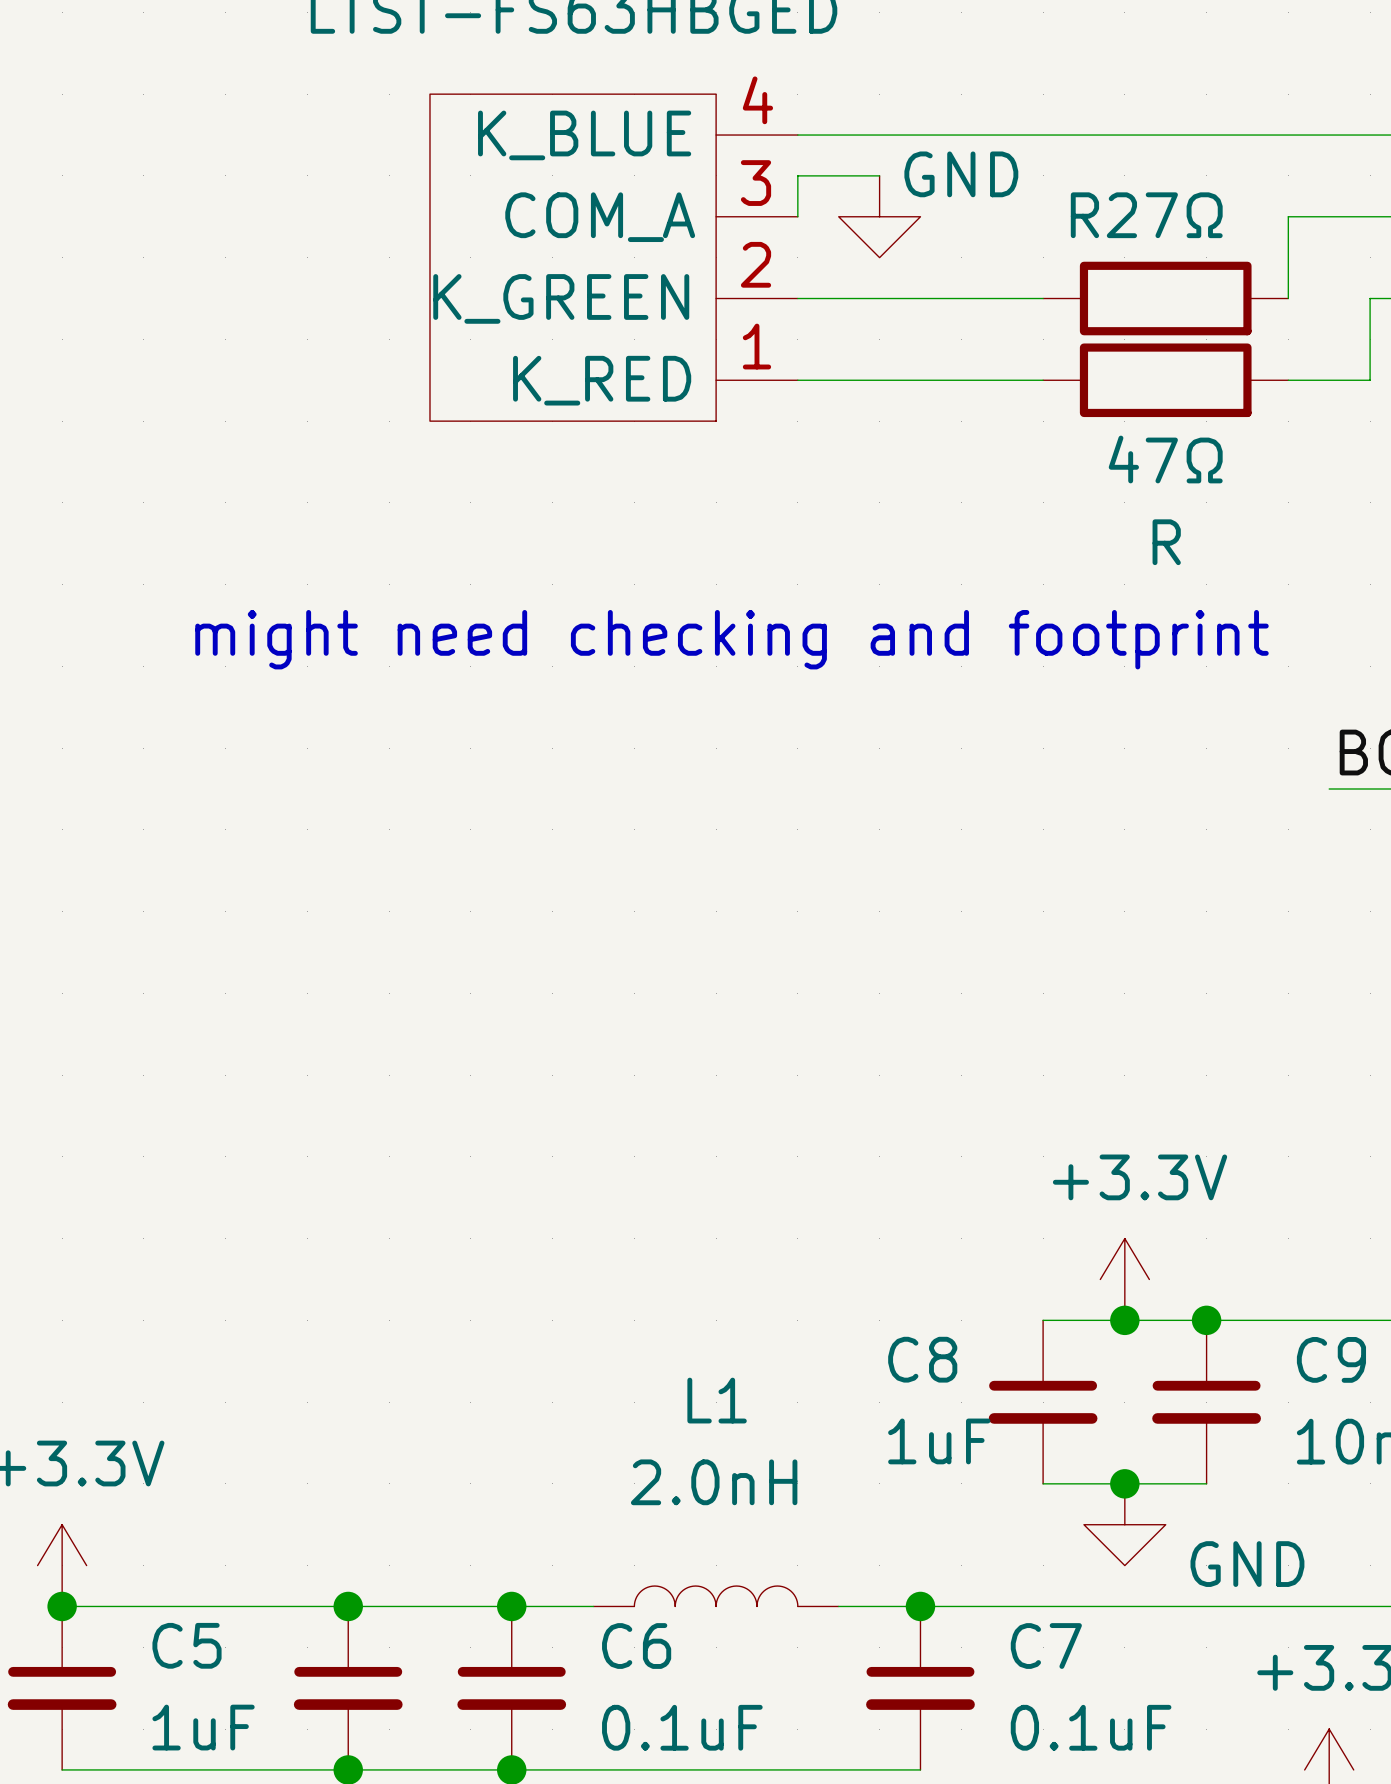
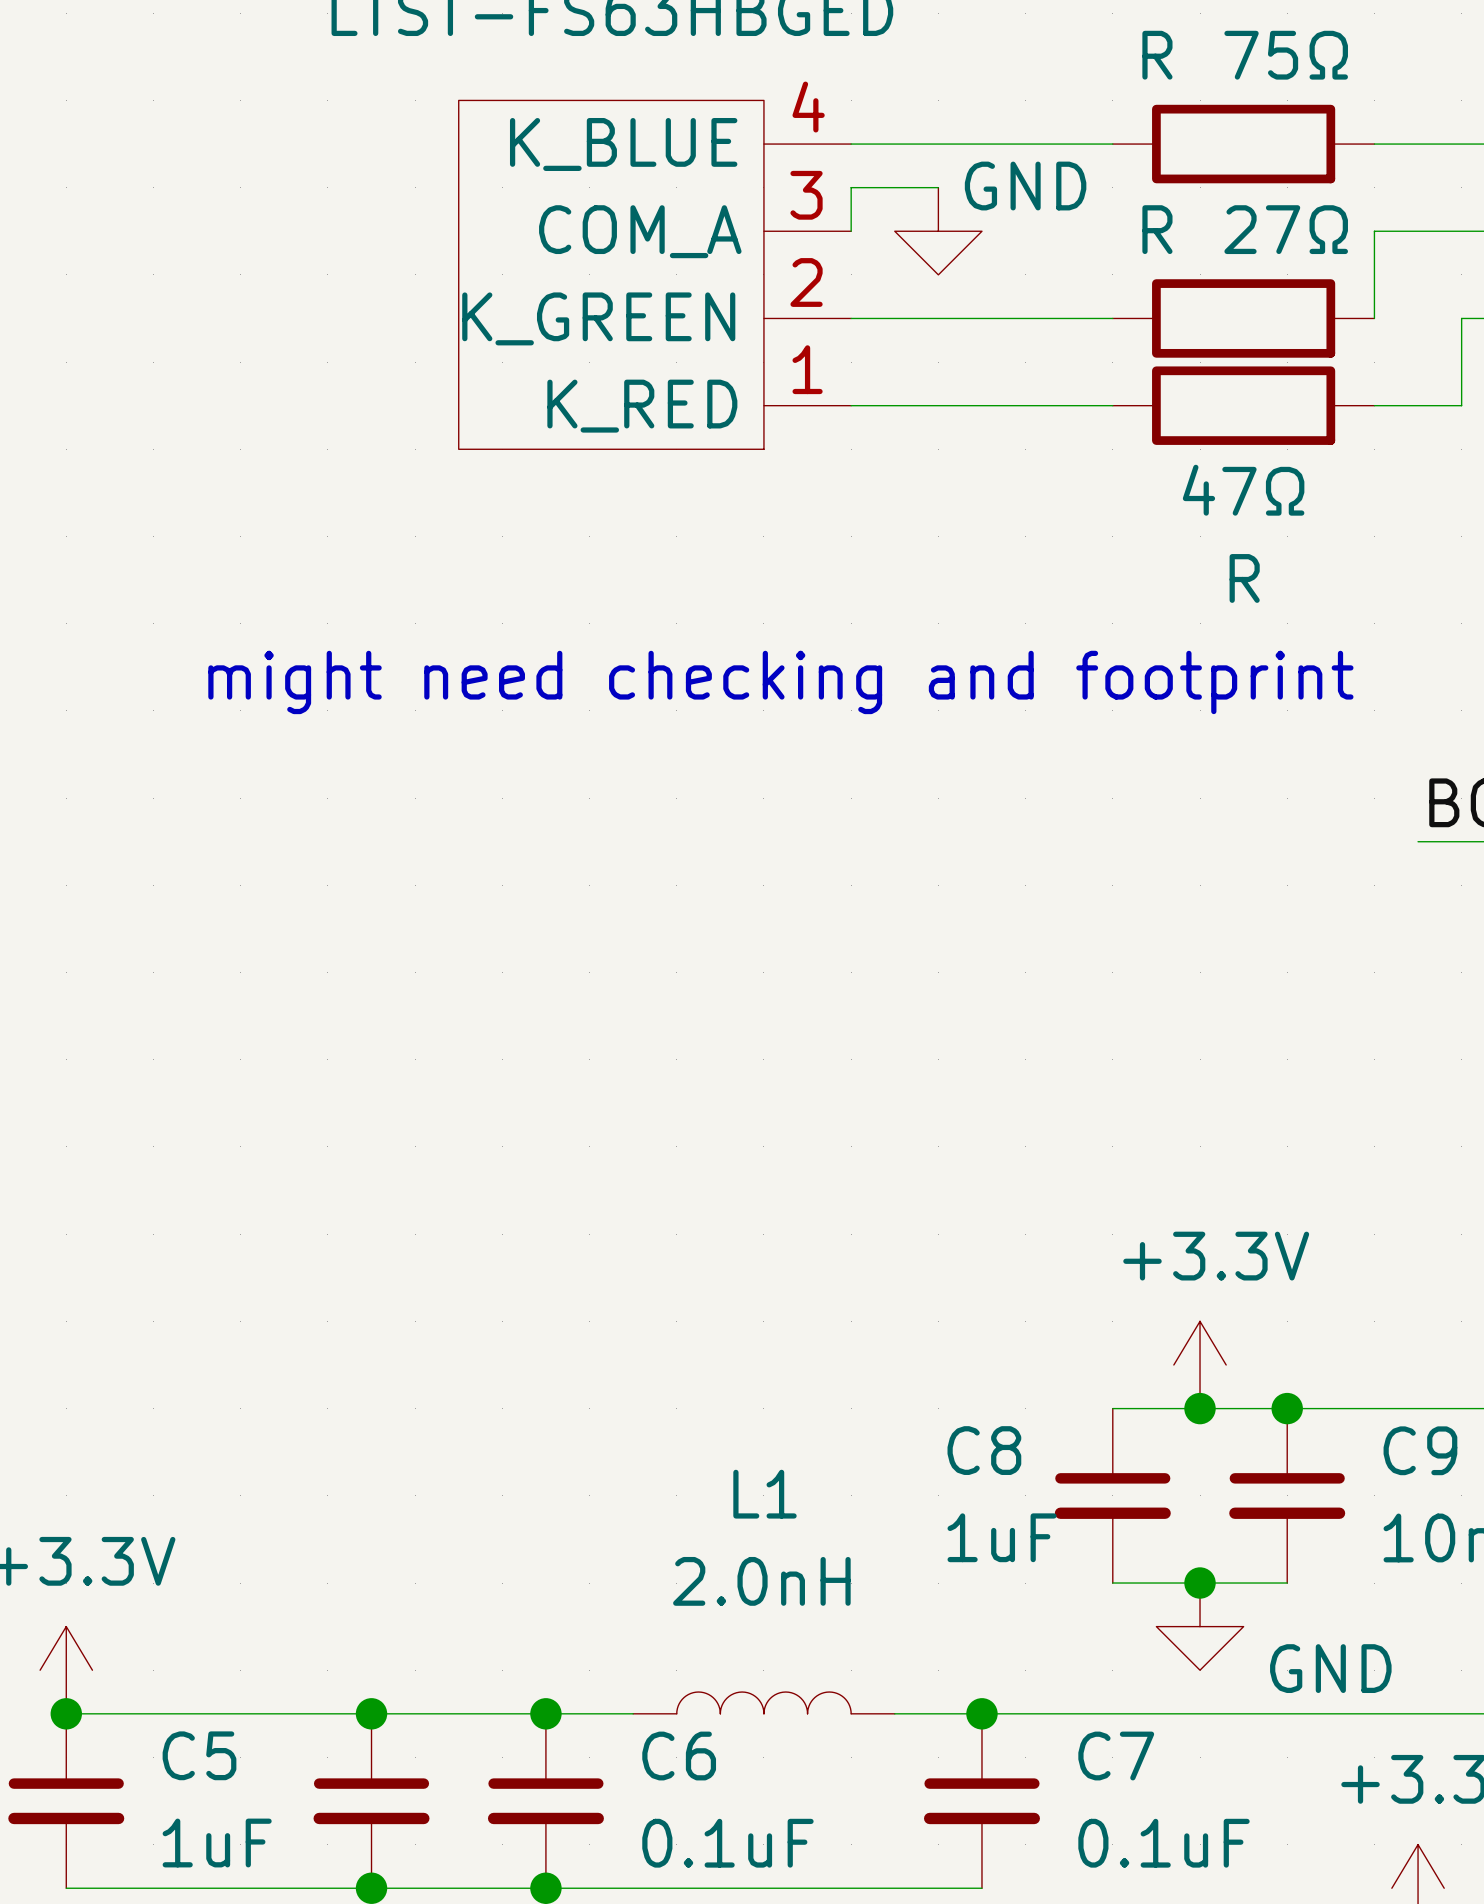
wire: (1043, 135) (1288, 135) -> none
75Ω: none -> R (1243, 144)
27Ω name position: 27Ω (1164, 215) -> 27Ω (1286, 229)

